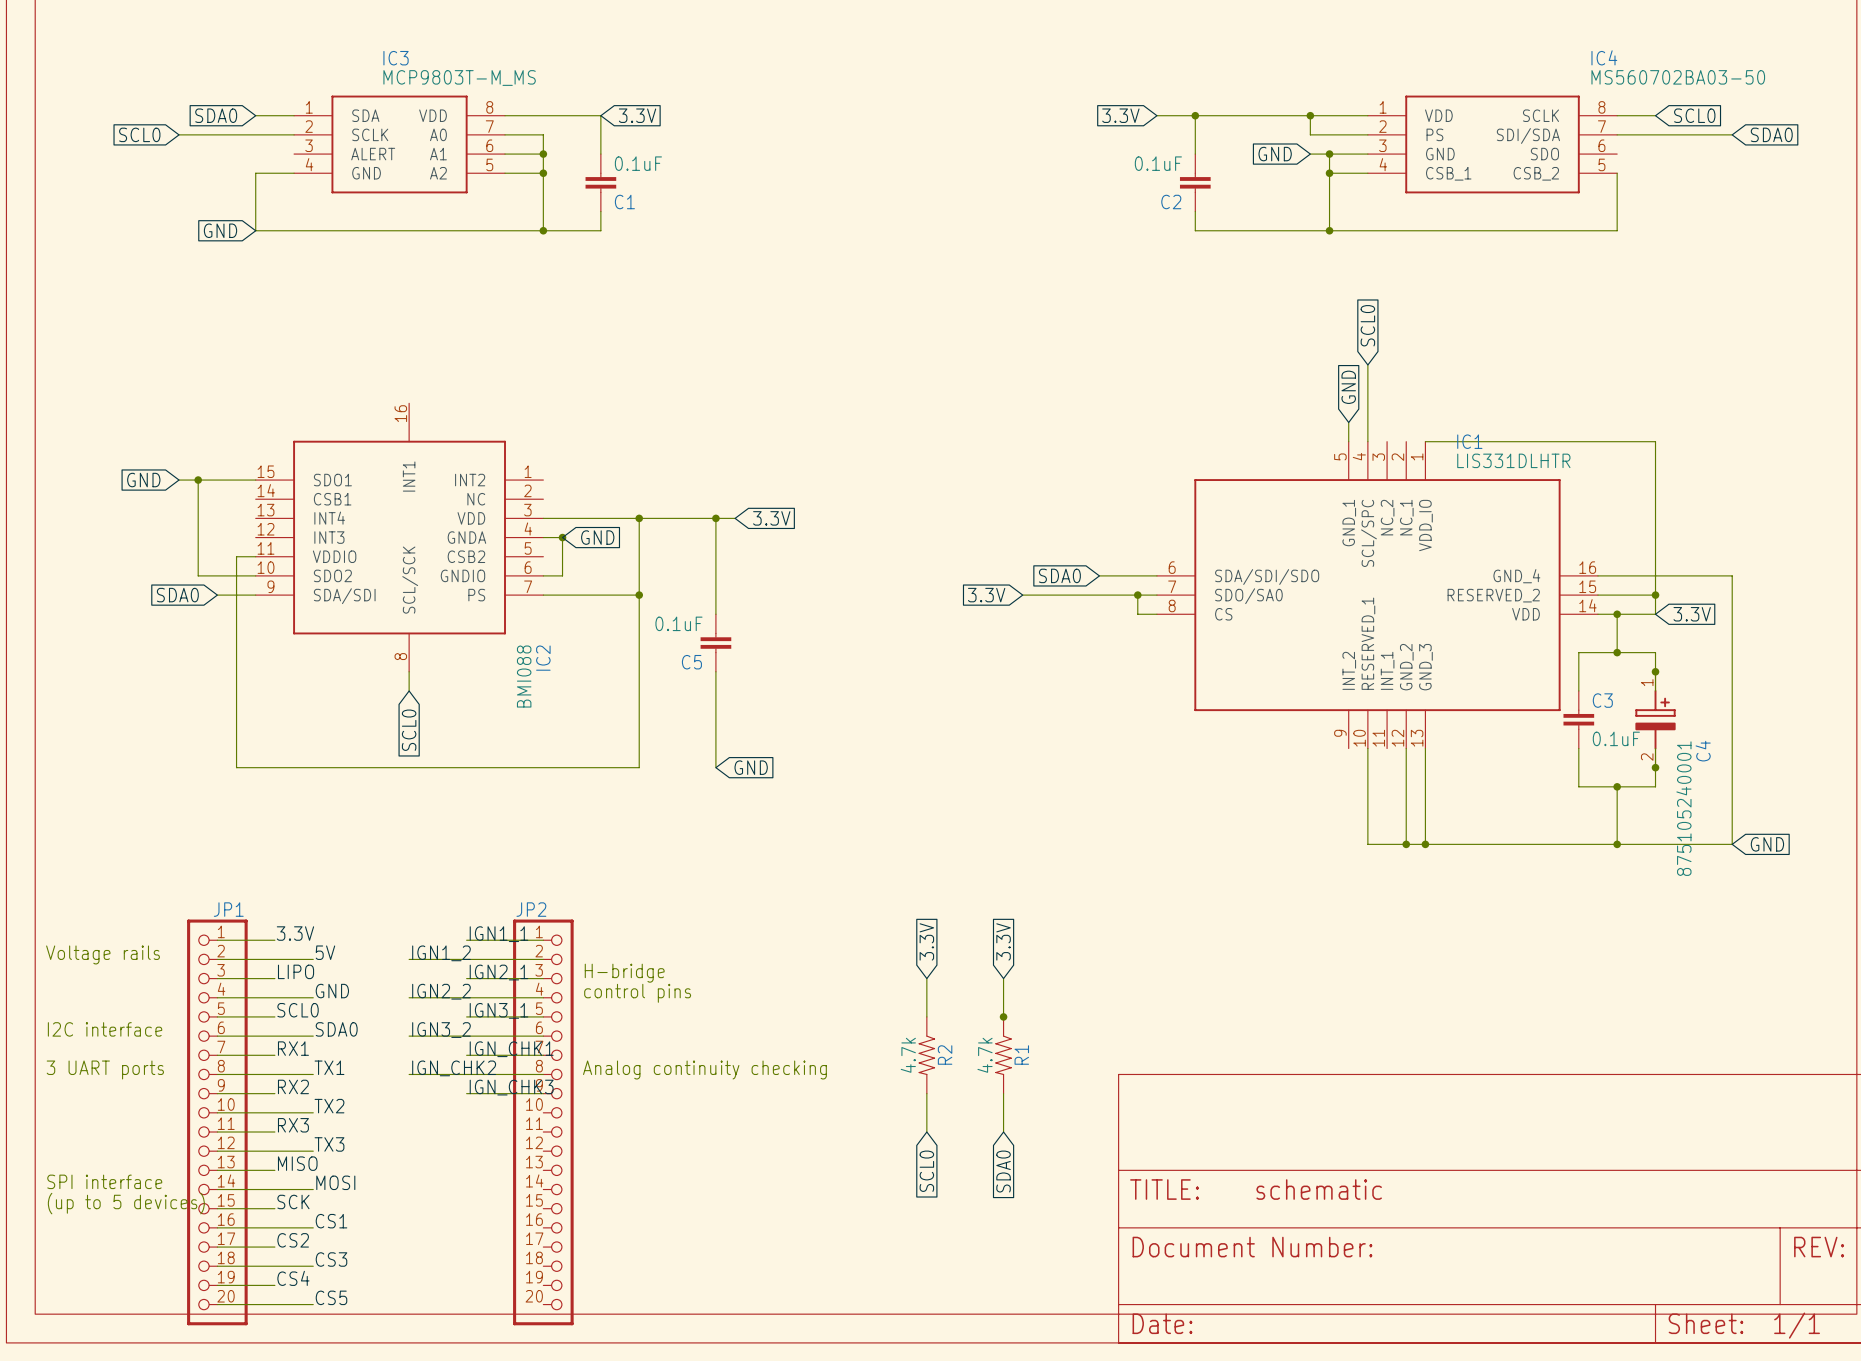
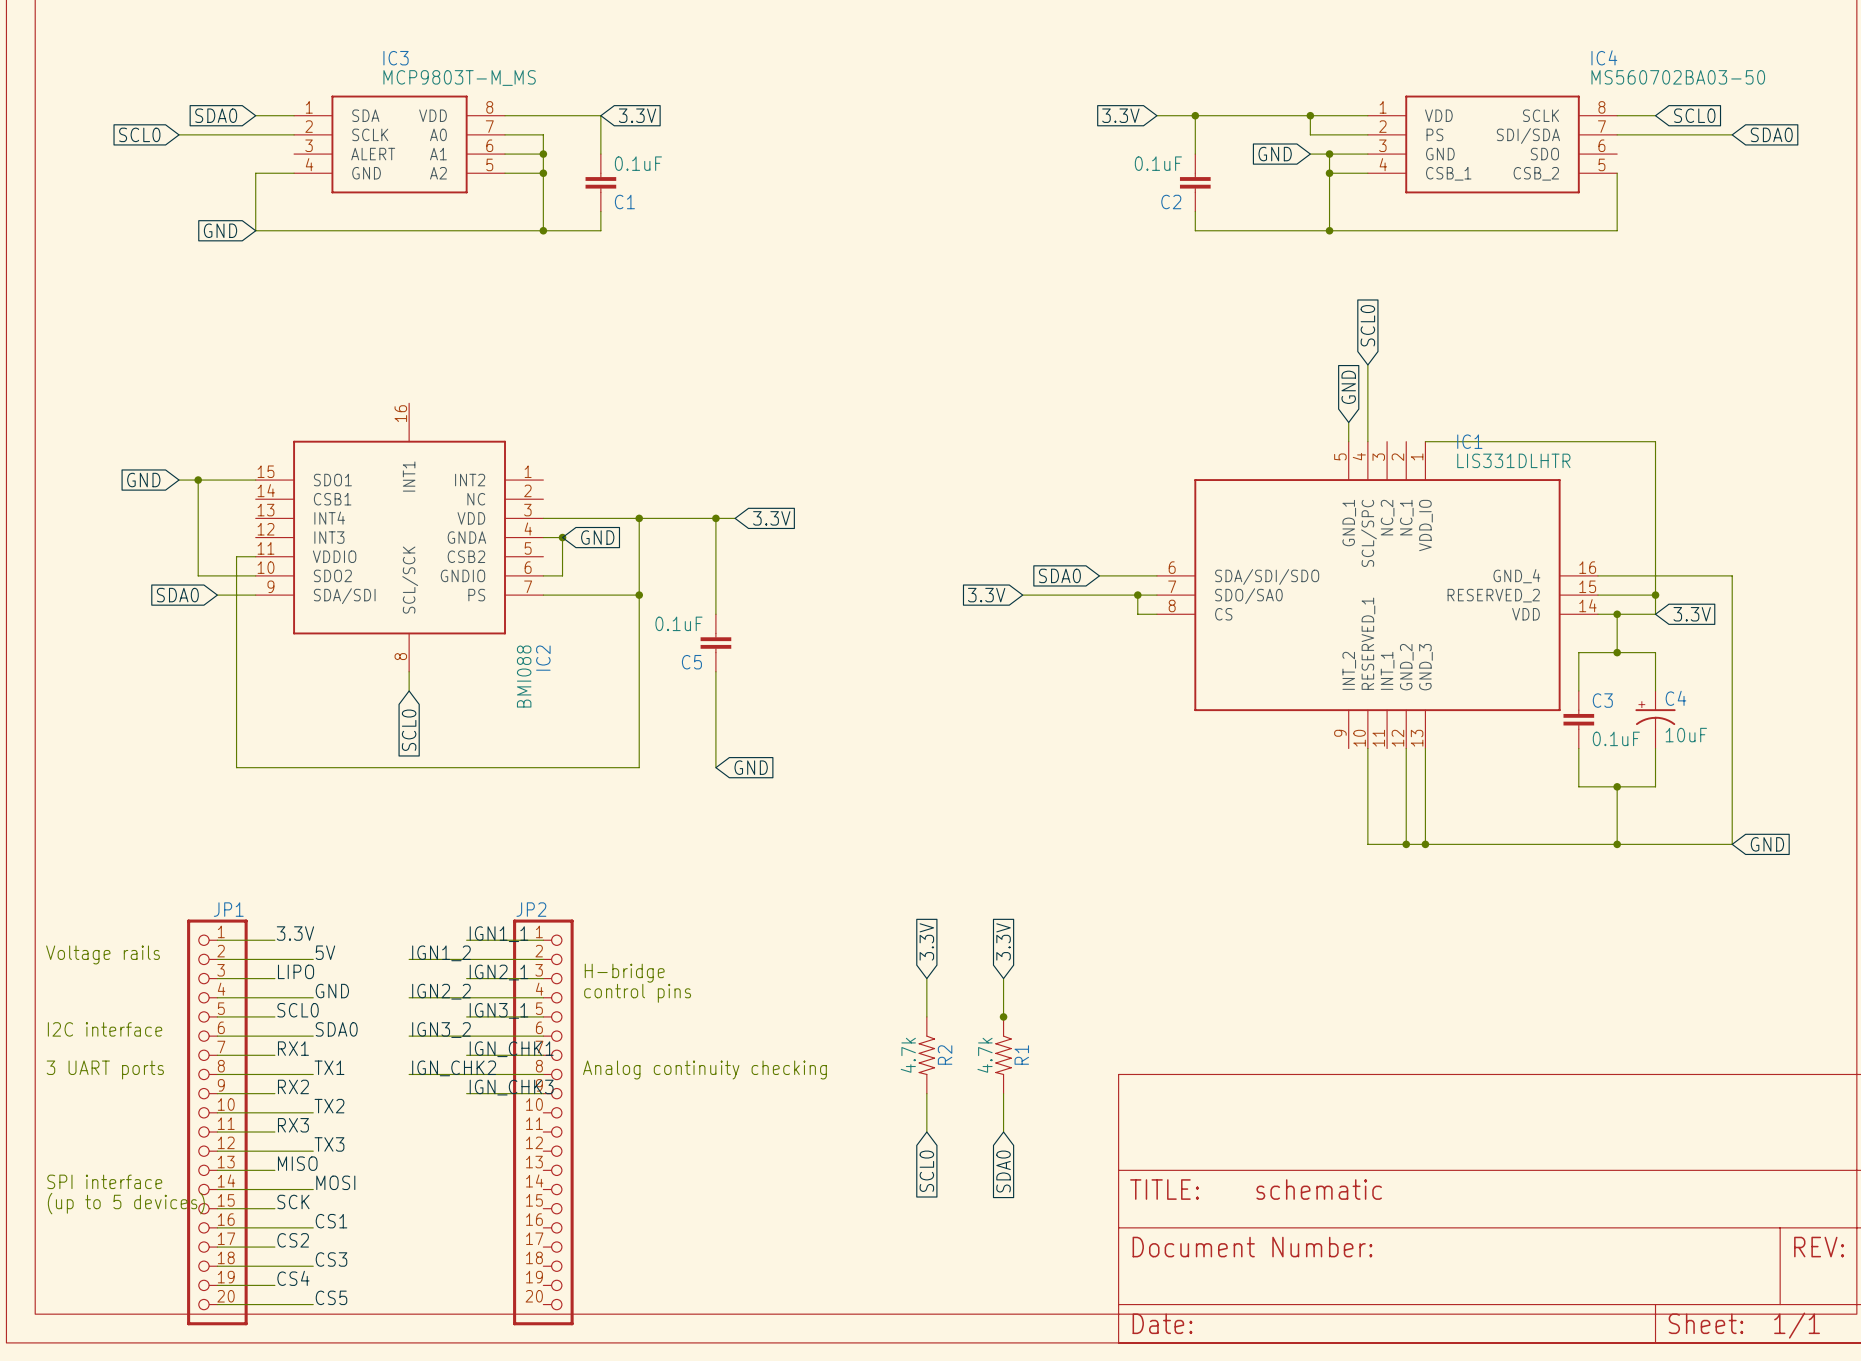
C4 symbol: [1635, 671, 1676, 768] -> [1635, 690, 1676, 749]
junction: (1655, 671) -> none
C4 name position: C4 (1703, 751) -> C4 (1675, 698)
junction: (1655, 767) -> none
C4 value: 875105240001 (1683, 808) -> 10uF (1686, 735)

